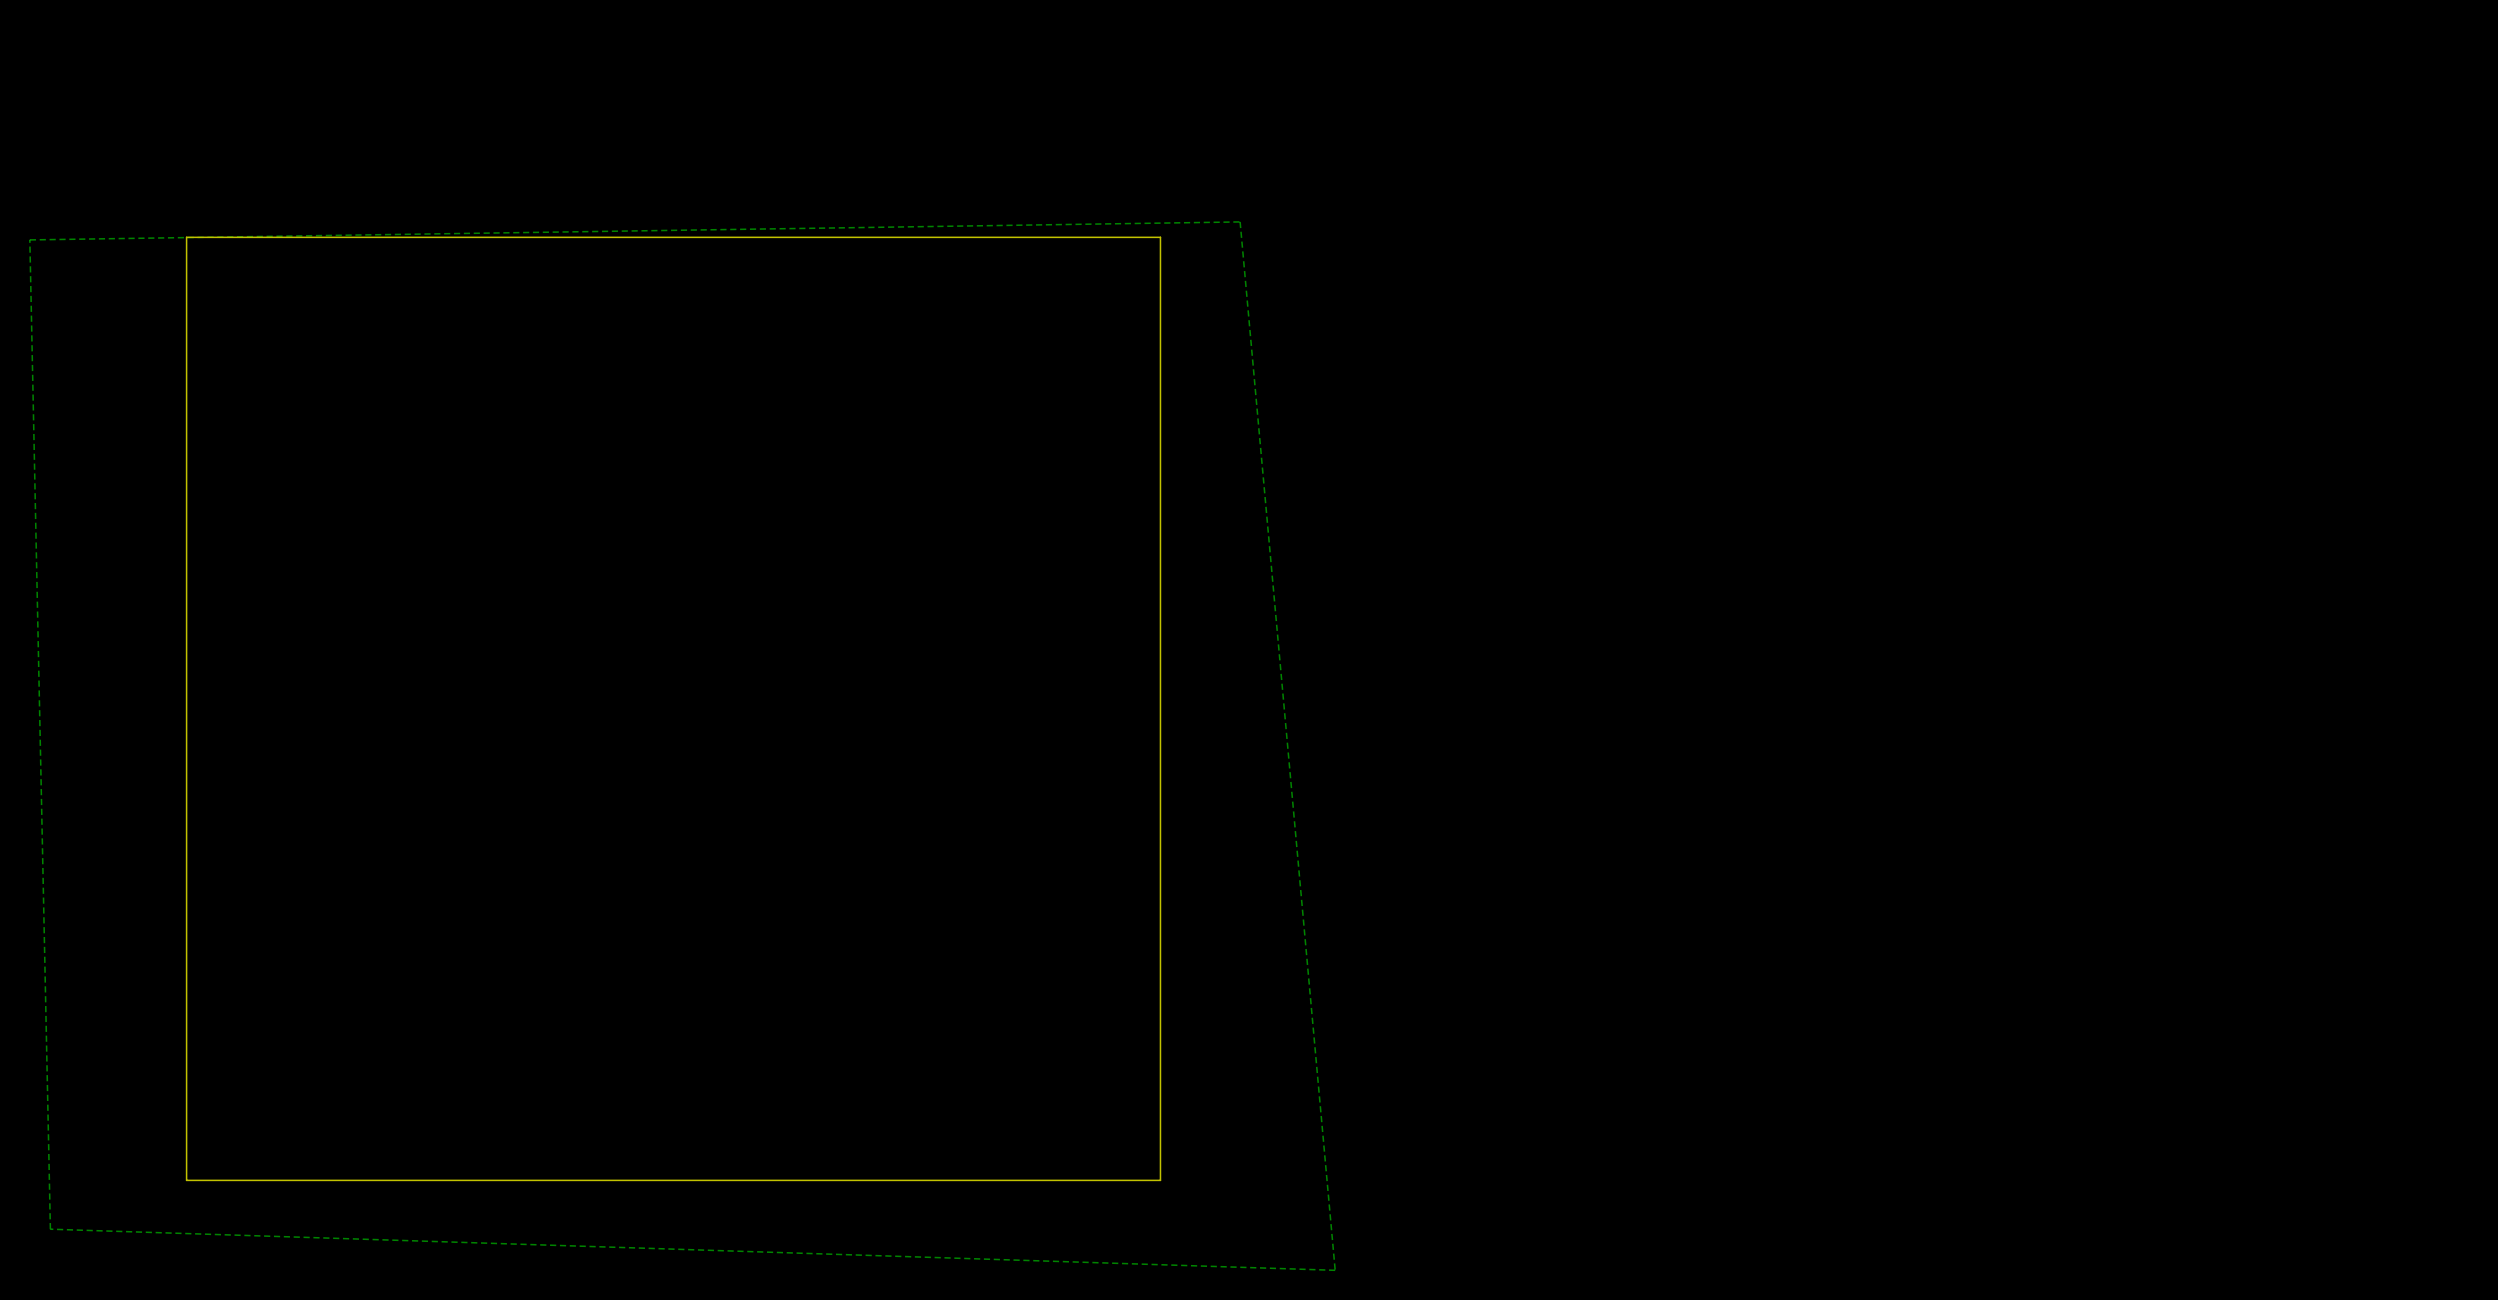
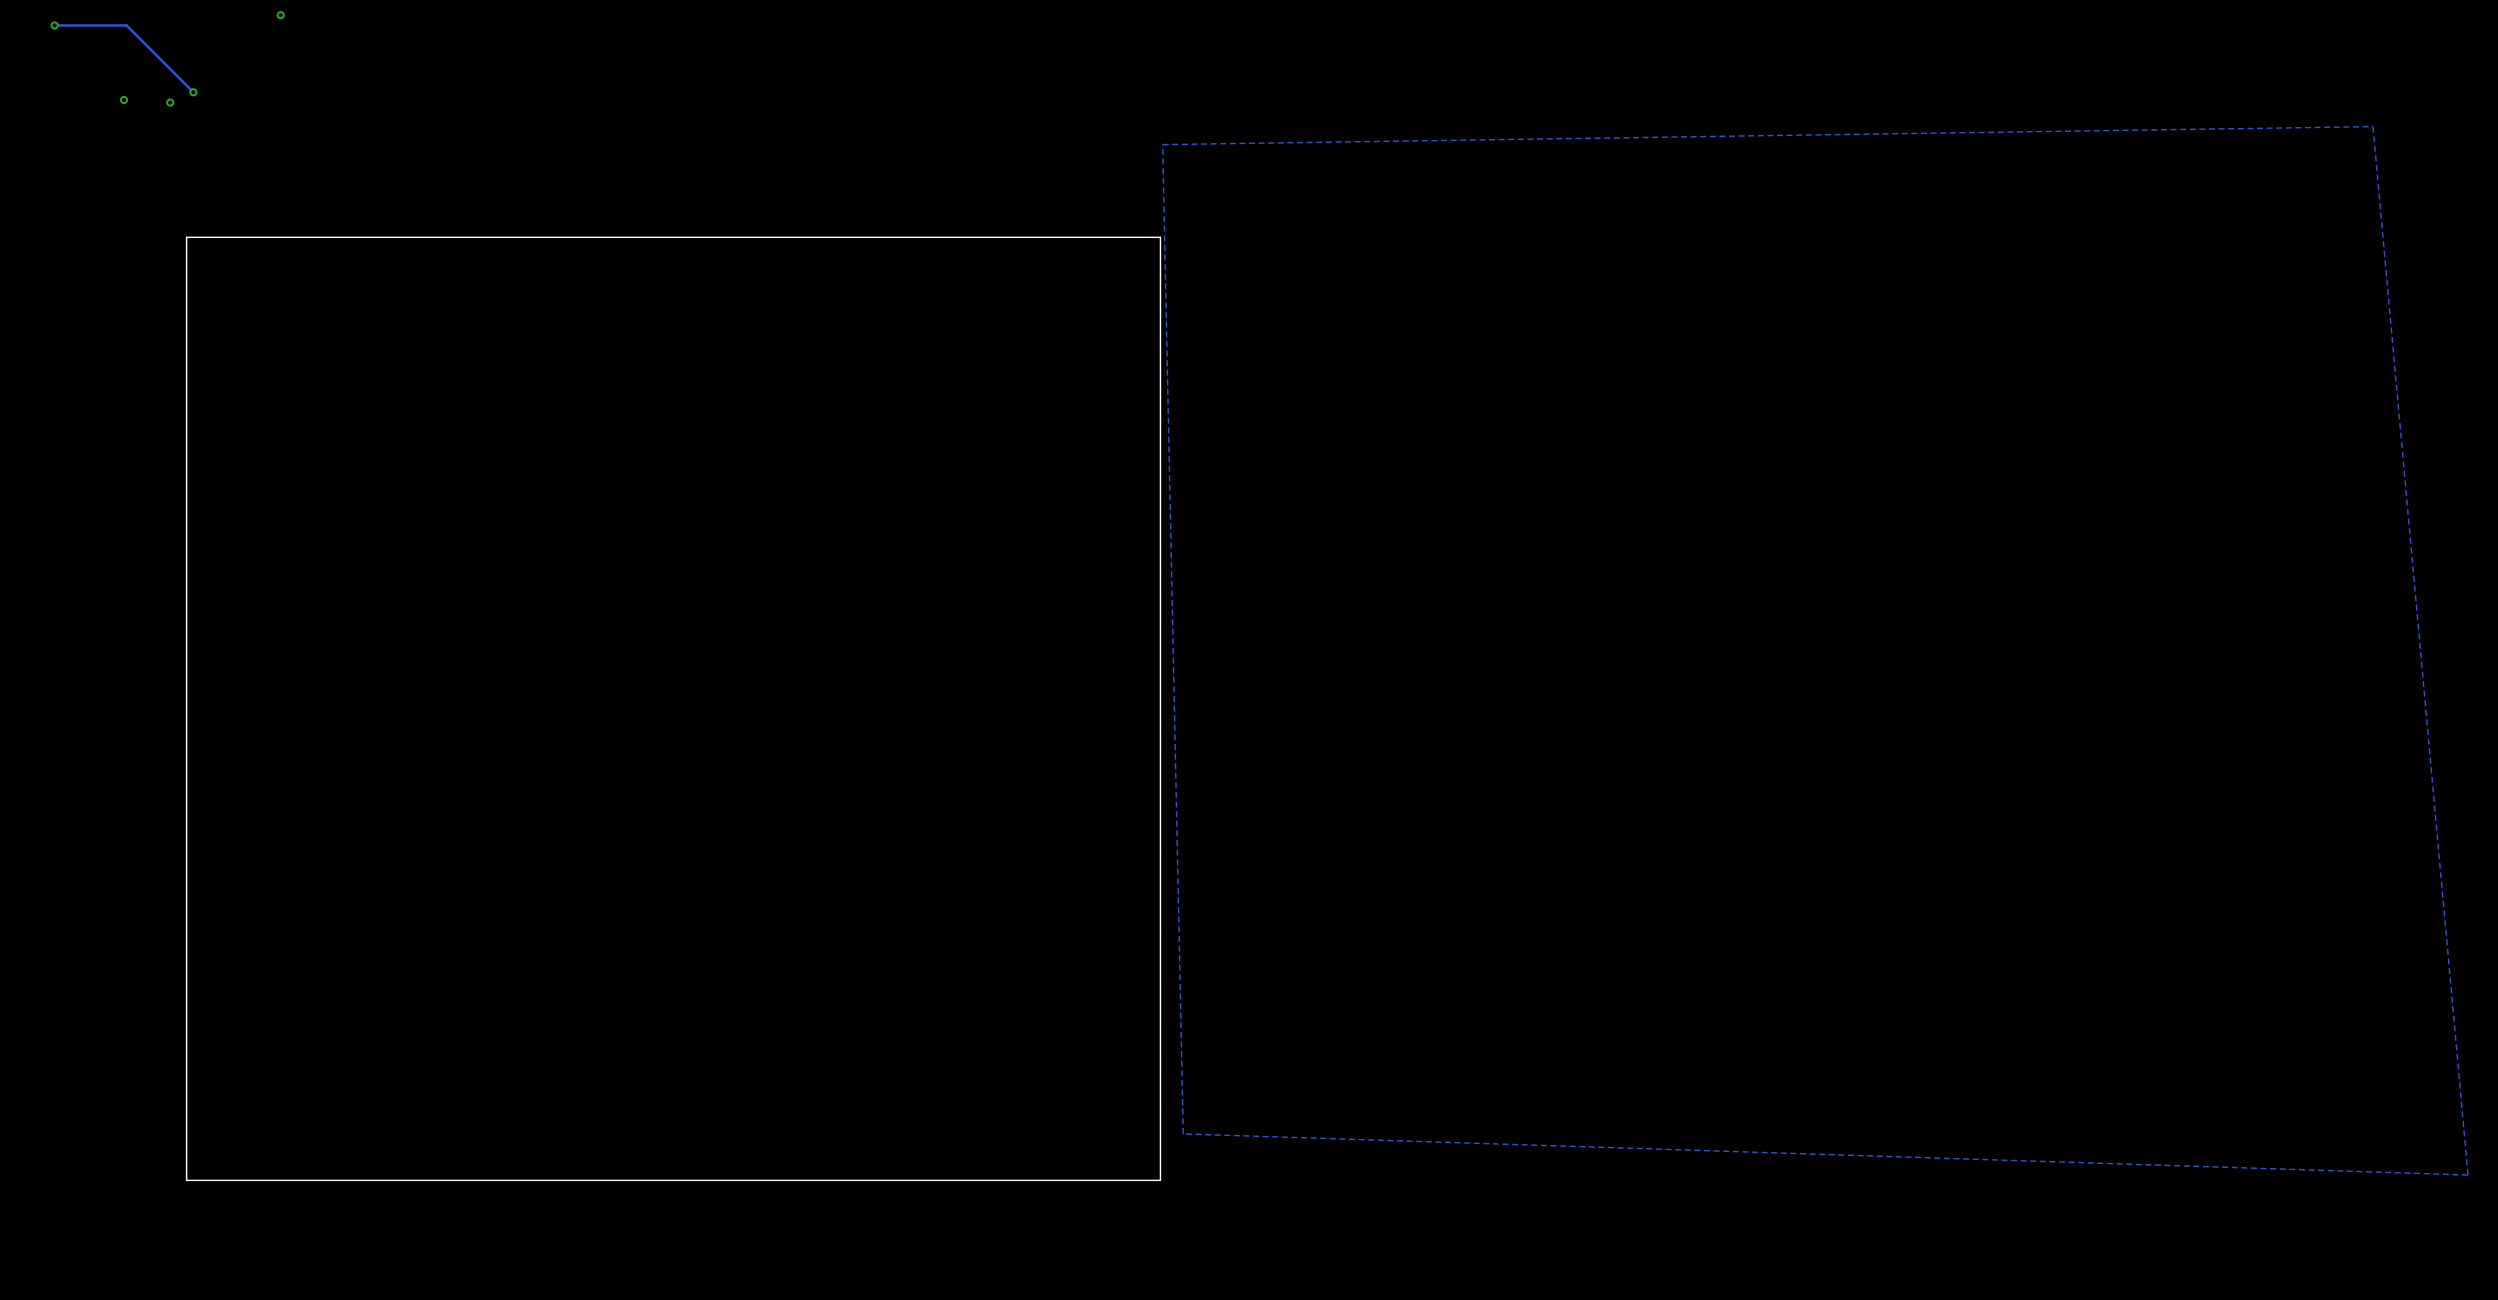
via: none -> (280, 15)
track: none -> (54, 25) (126, 25) (193, 92)
via: none -> (54, 25)
via: none -> (193, 92)
via: none -> (124, 99)
via: none -> (170, 102)
zone outline: none -> (2372, 126) (1162, 144) (1183, 1133) (2468, 1175) (2372, 126)
zone outline: (1240, 221) (29, 239) (50, 1229) (1335, 1270) (1240, 221) -> none

